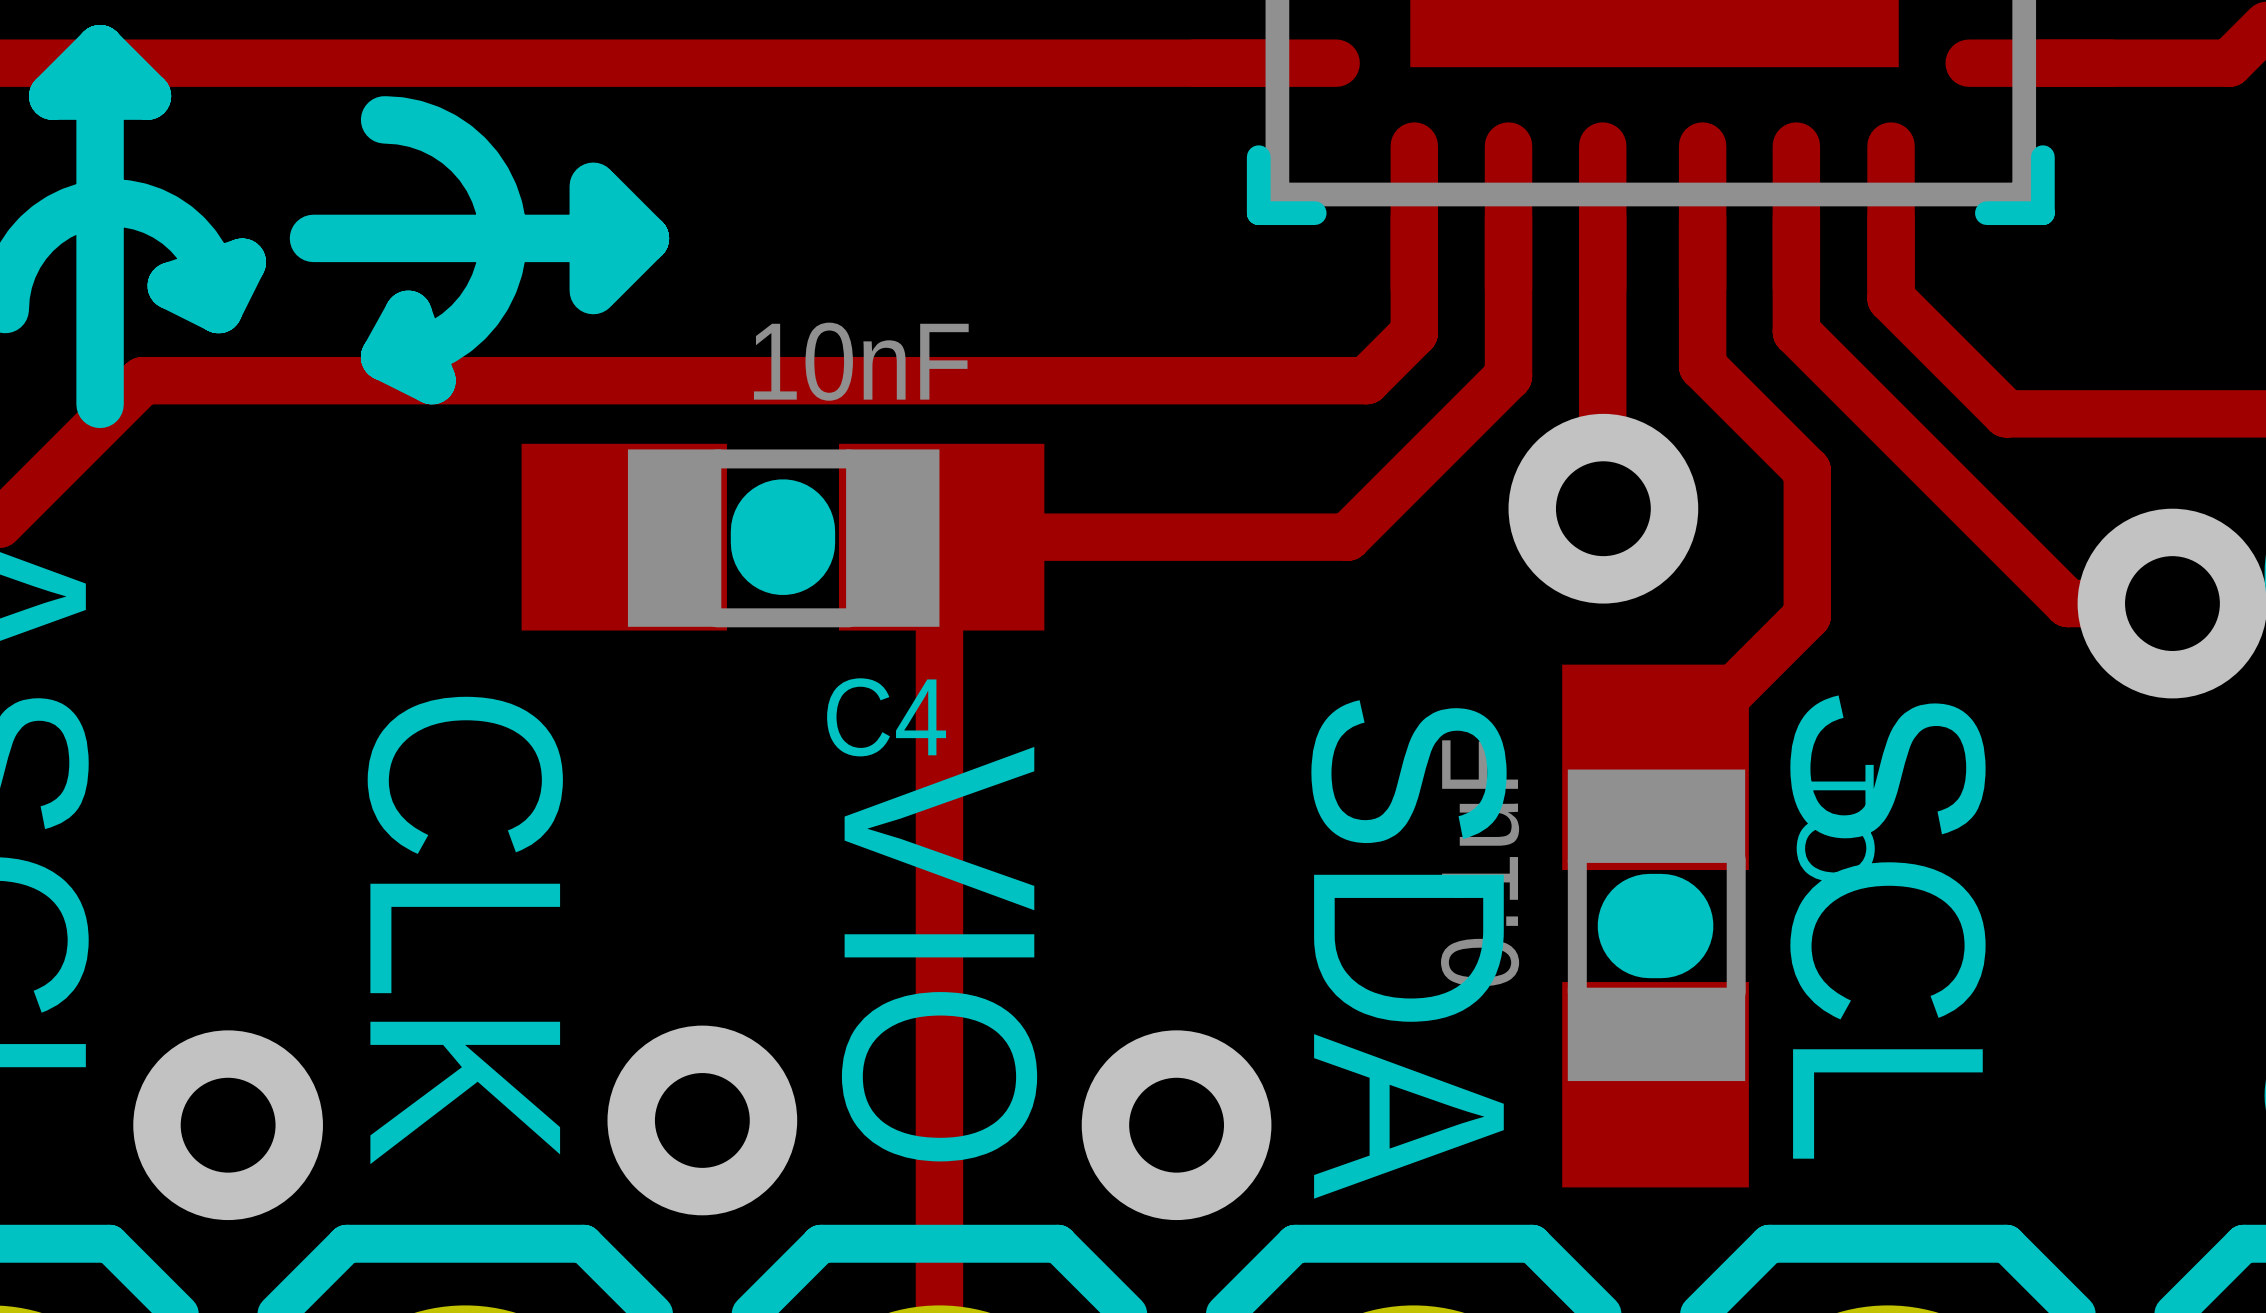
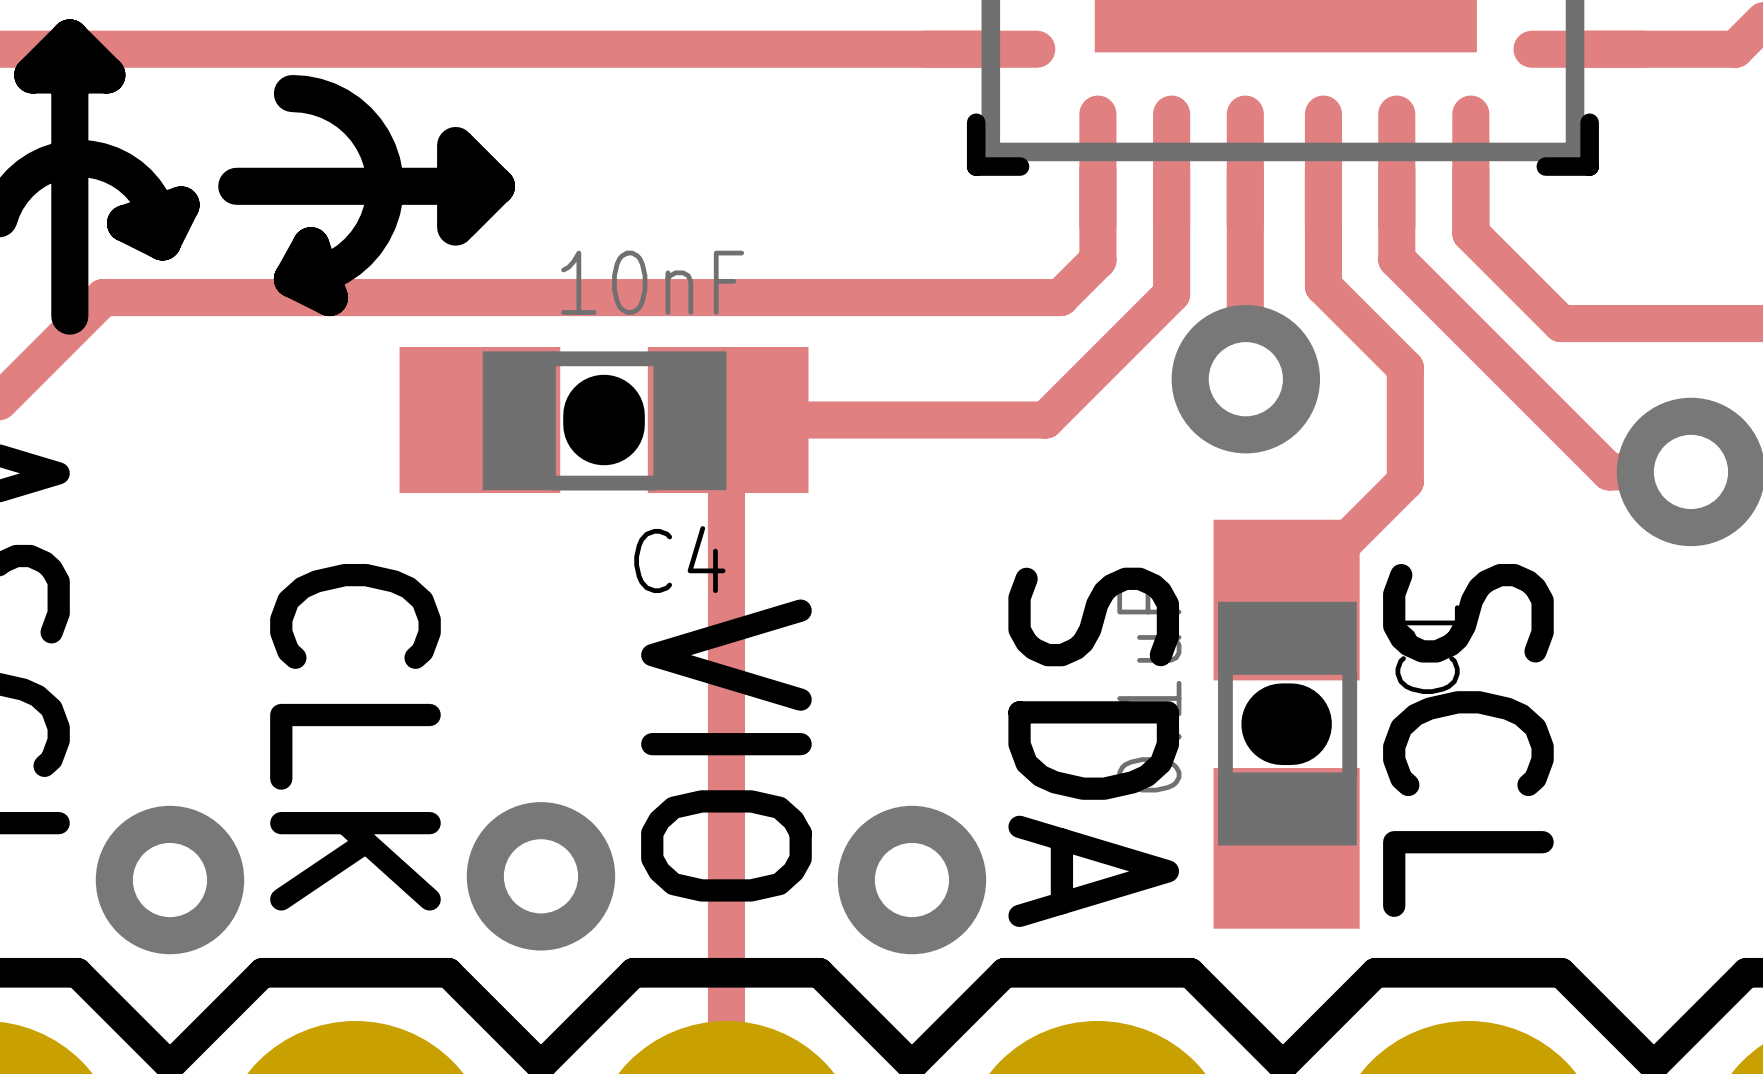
via position: (1603, 508) -> (1245, 379)

